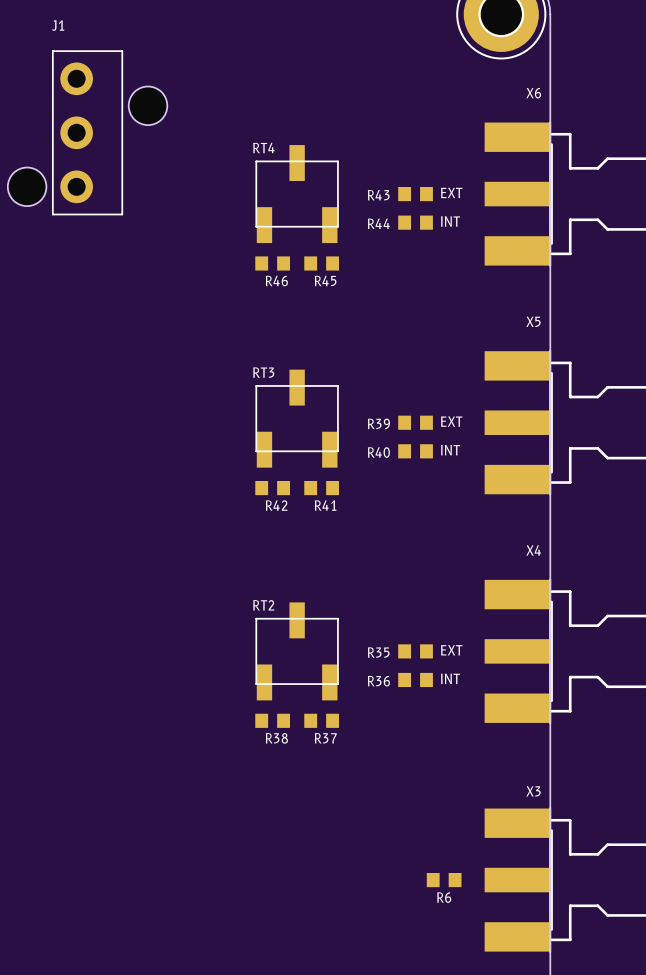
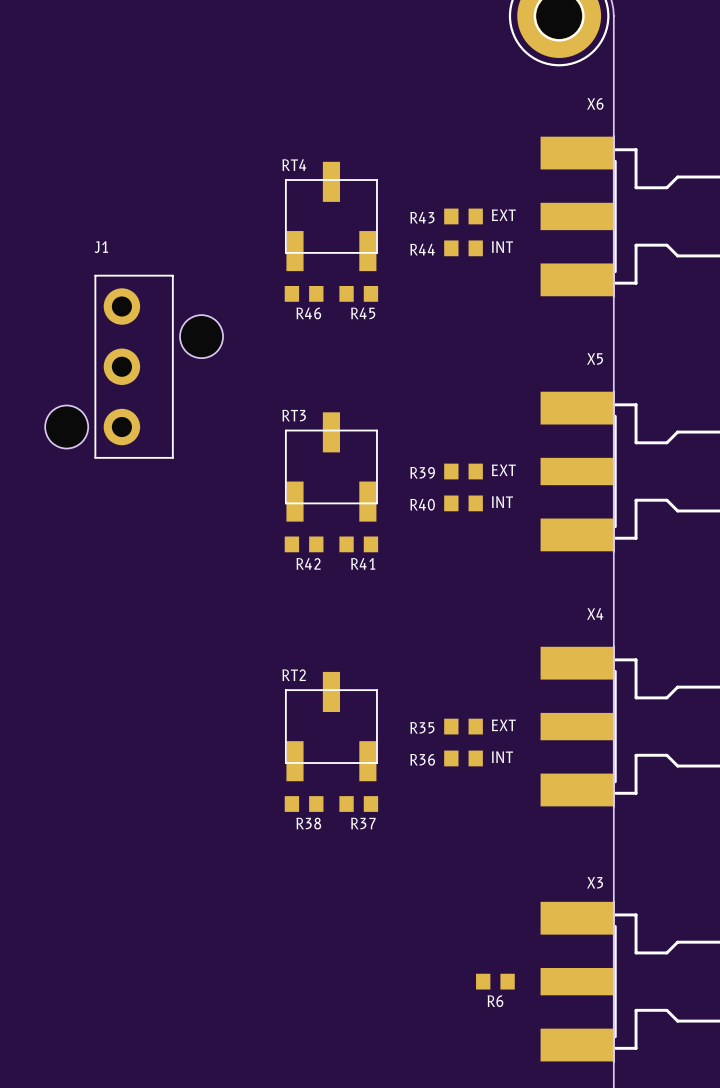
J1 position: (87, 132) -> (134, 366)

